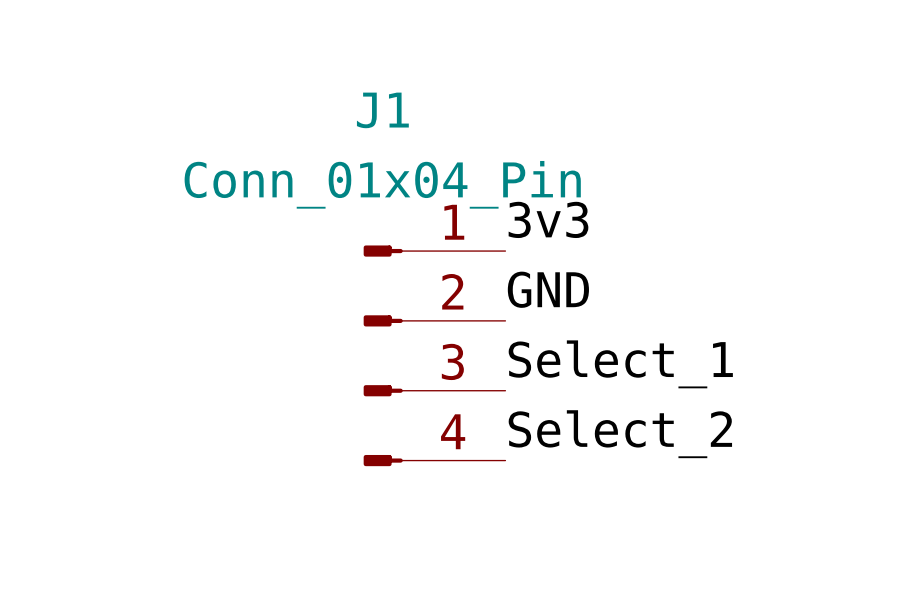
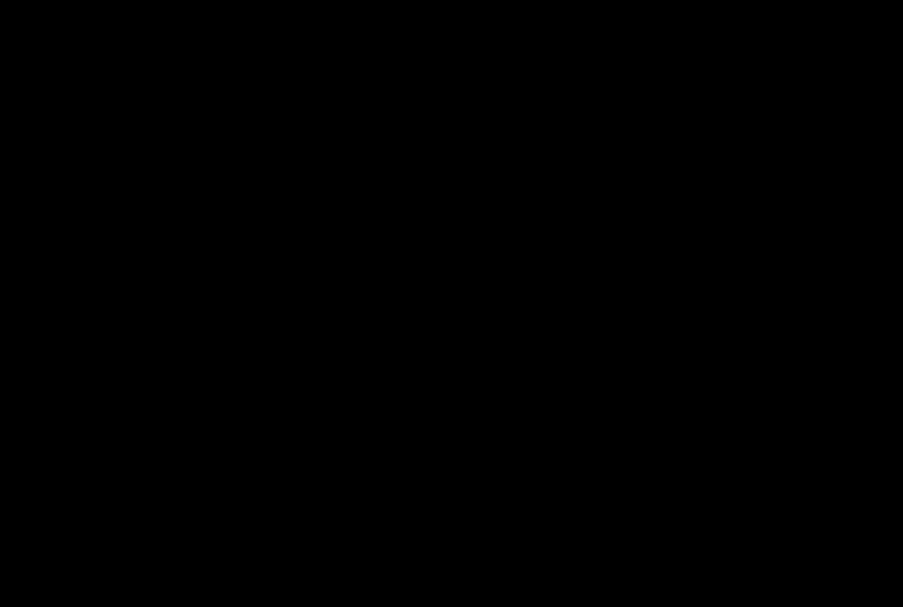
label: 3v3 (548, 219) -> none
label: GND (548, 289) -> none
J1: Conn_01x04_Pin (434, 355) -> none
label: Select_1 (620, 364) -> none
label: Select_2 (620, 434) -> none

